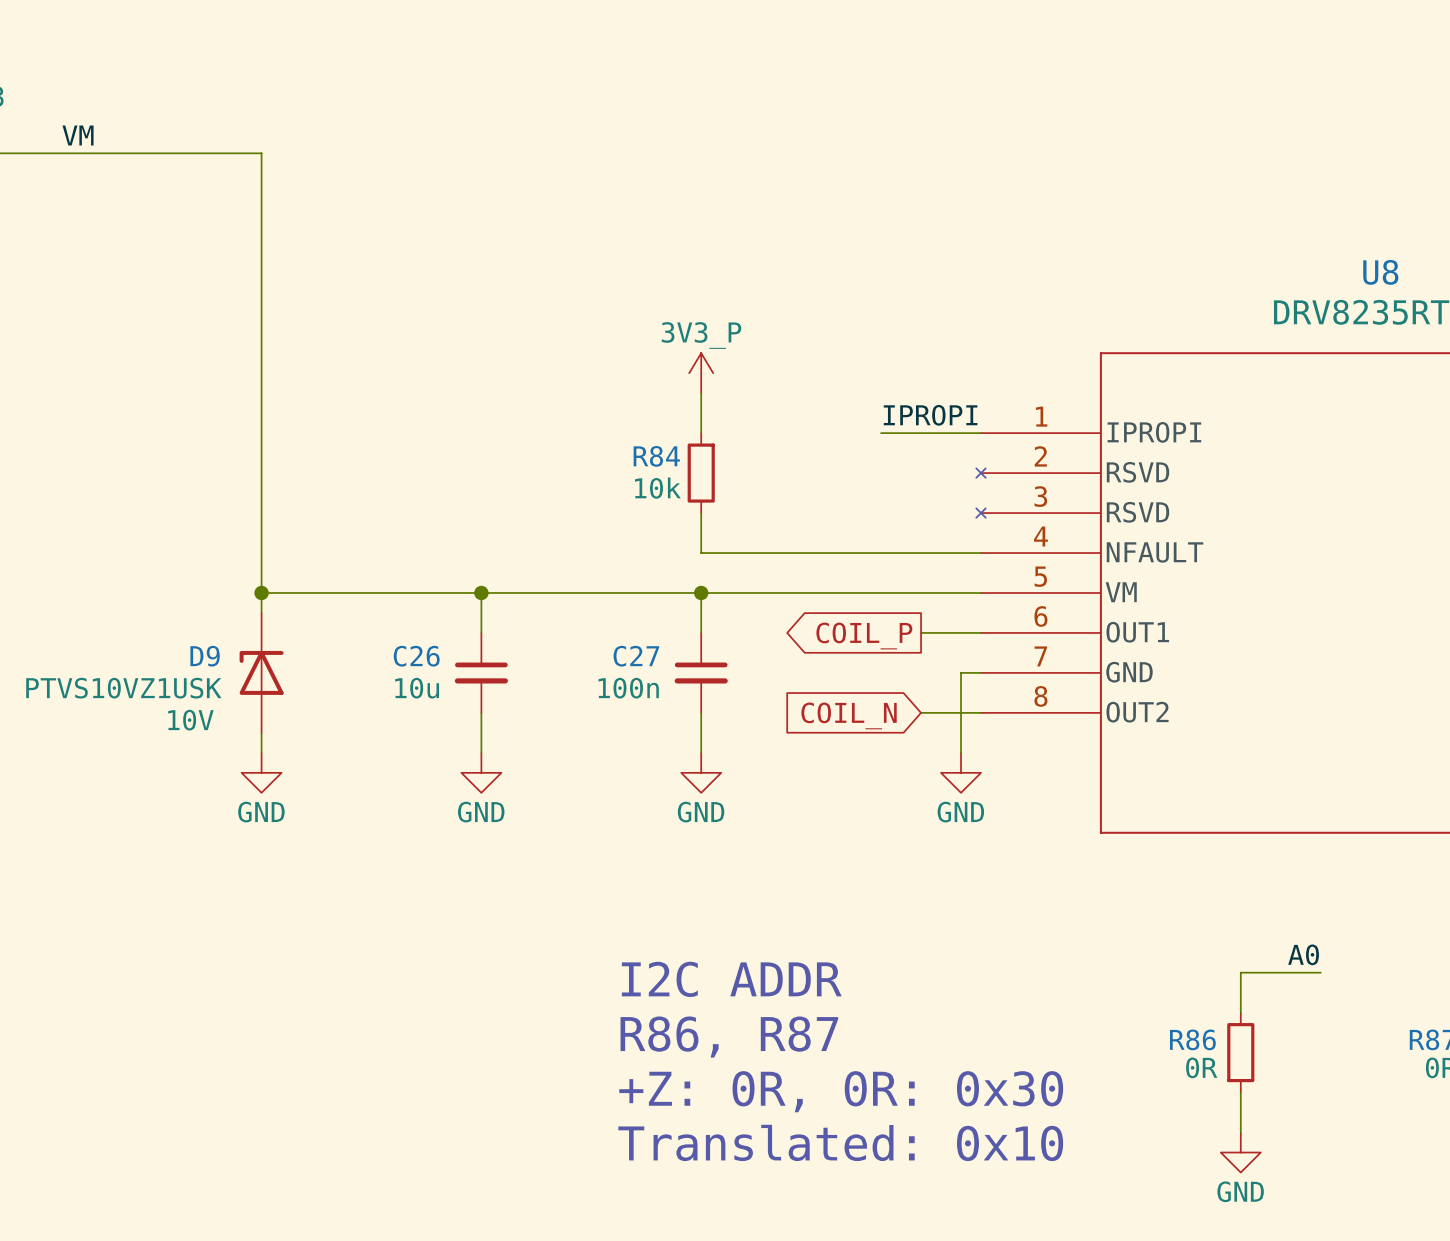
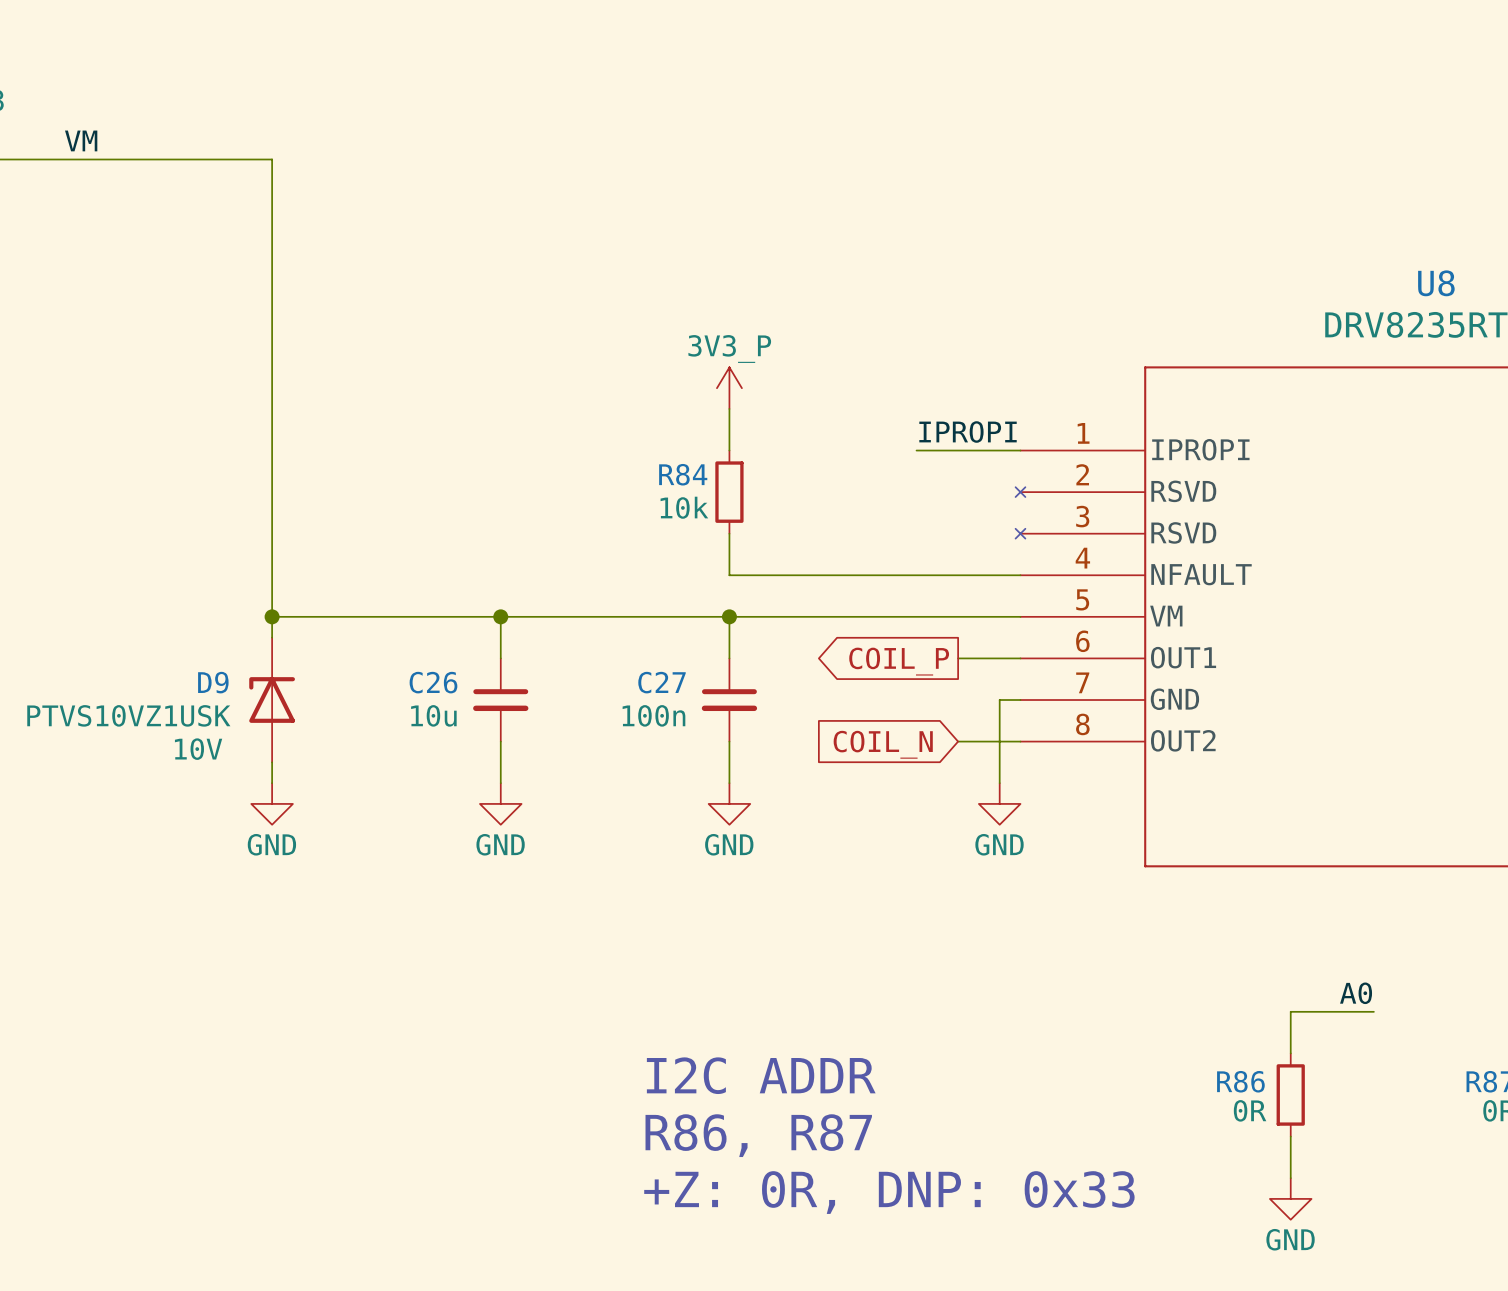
text: I2C ADDR (731, 979) -> none
text: R86, R87 (729, 1037) -> I2C ADDR (761, 1075)
text: +Z: 0R, 0R: 0x30 (841, 1091) -> R86, R87 (758, 1135)
text: Translated: 0x10 (840, 1142) -> +Z: 0R, DNP: 0x33 (889, 1192)

